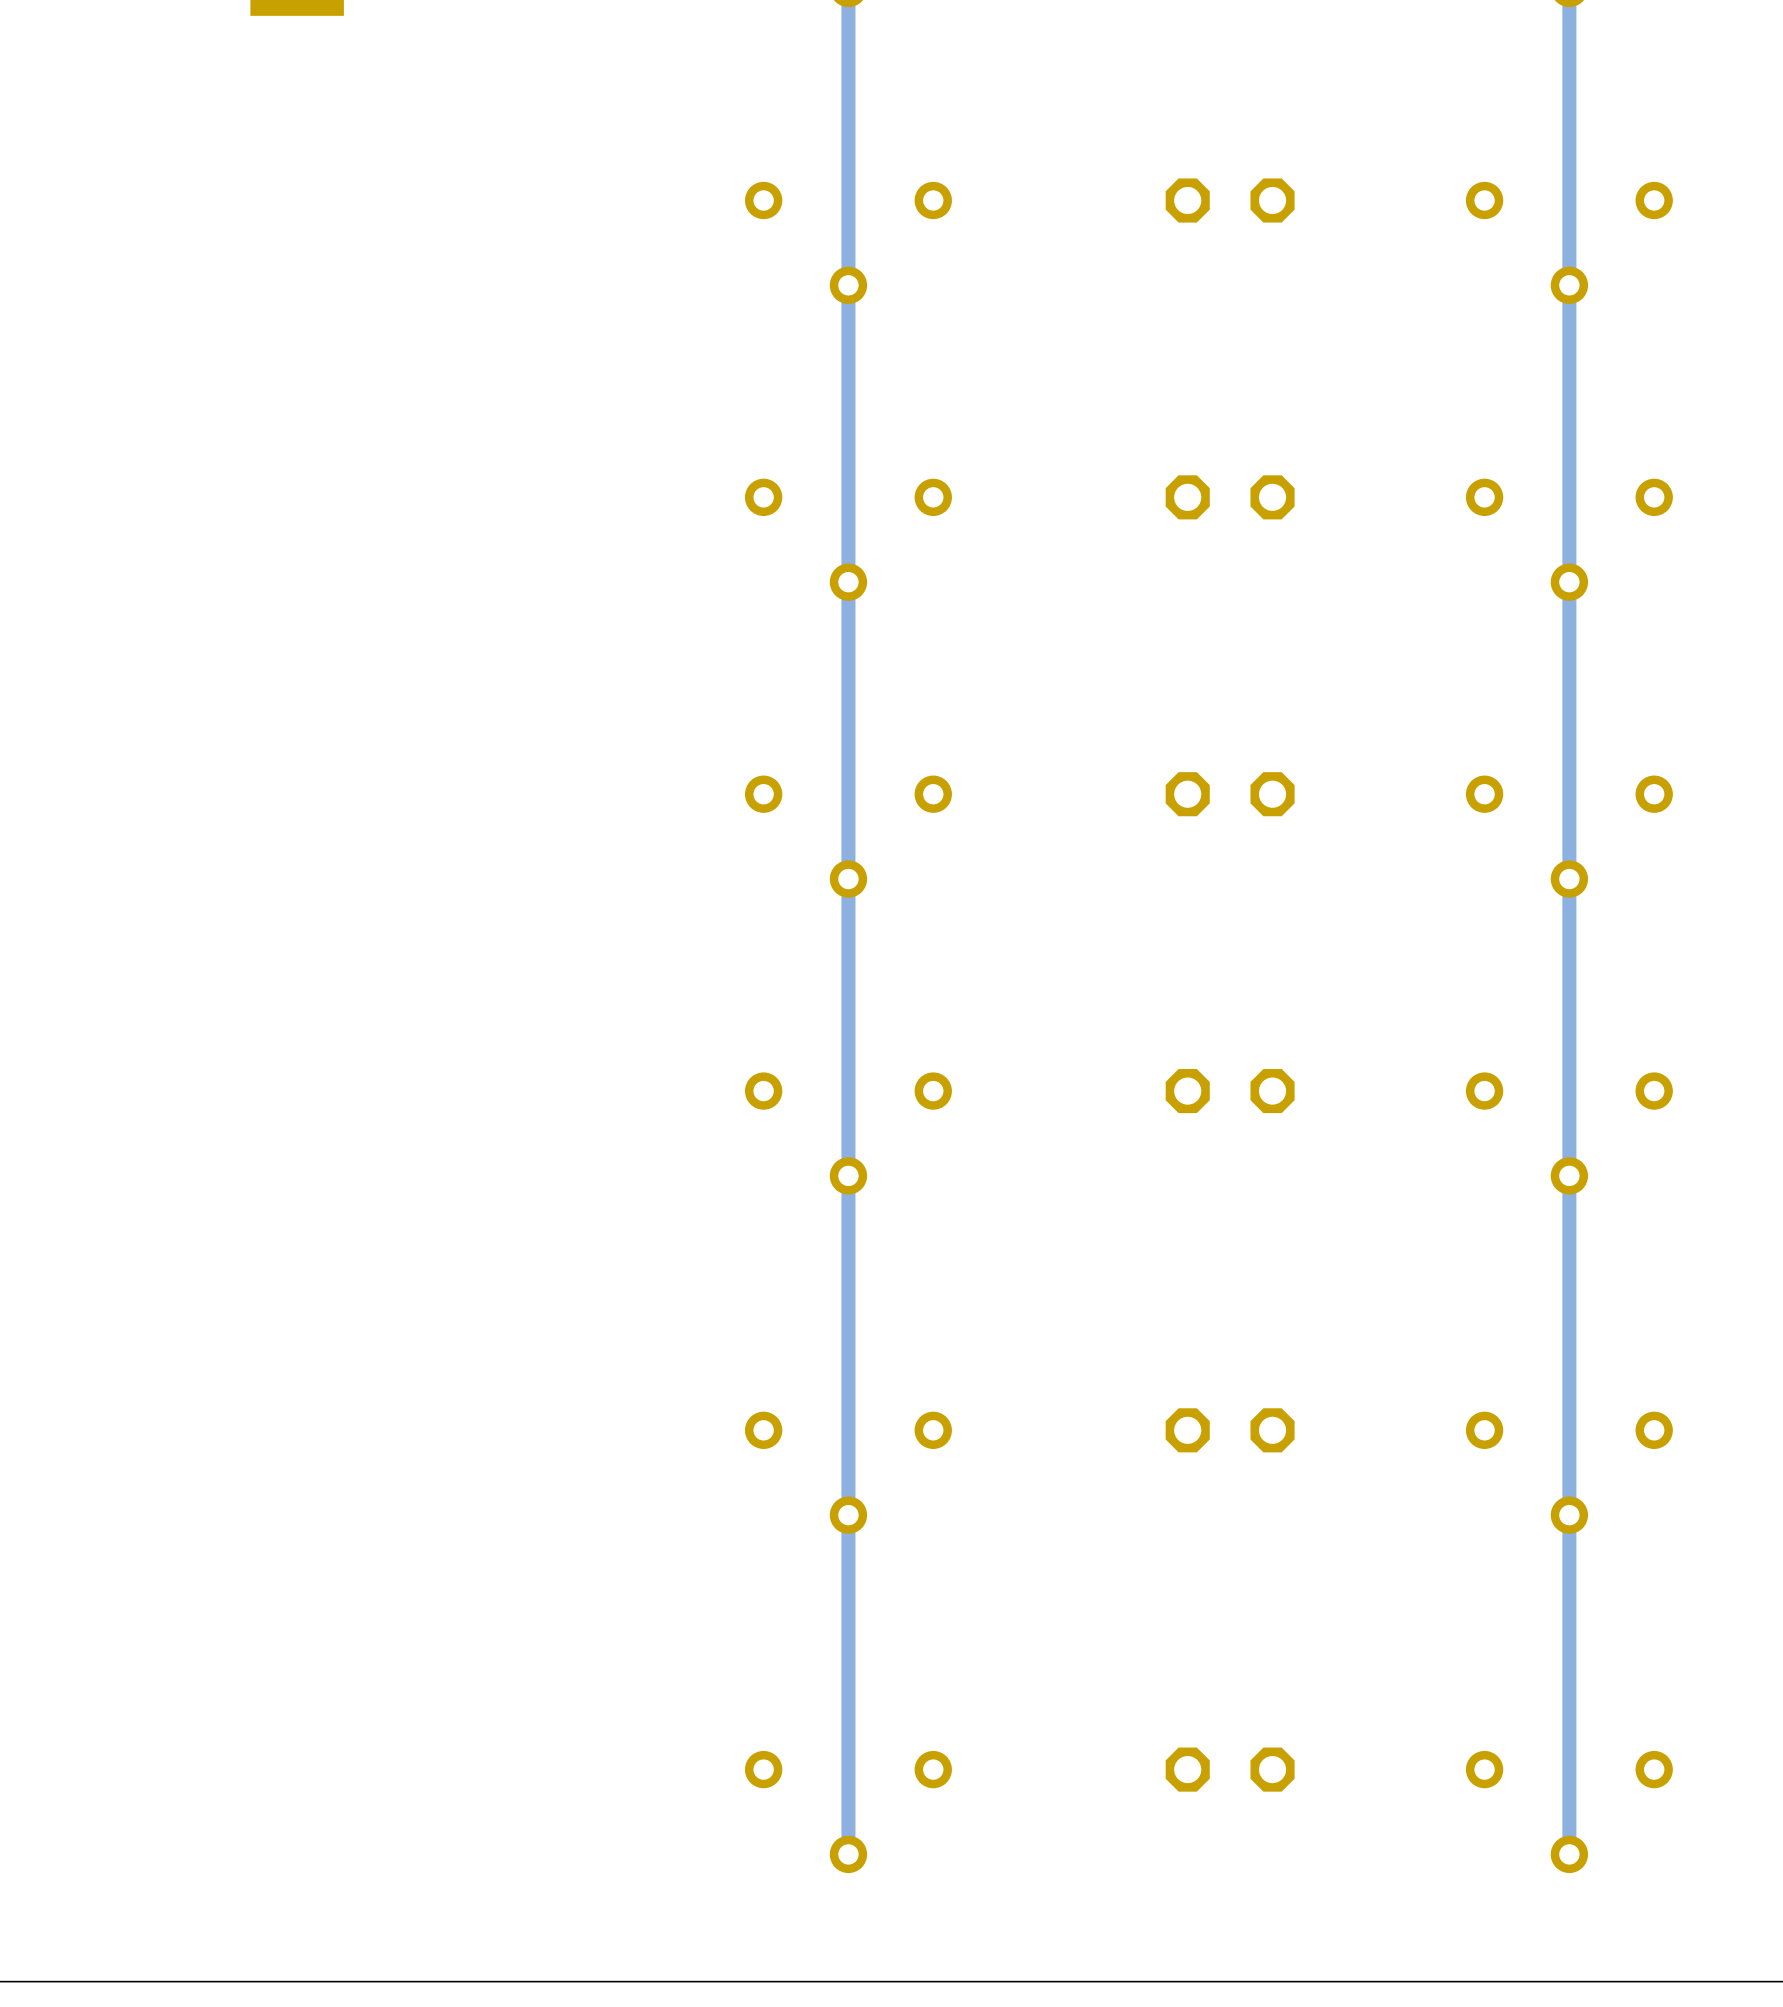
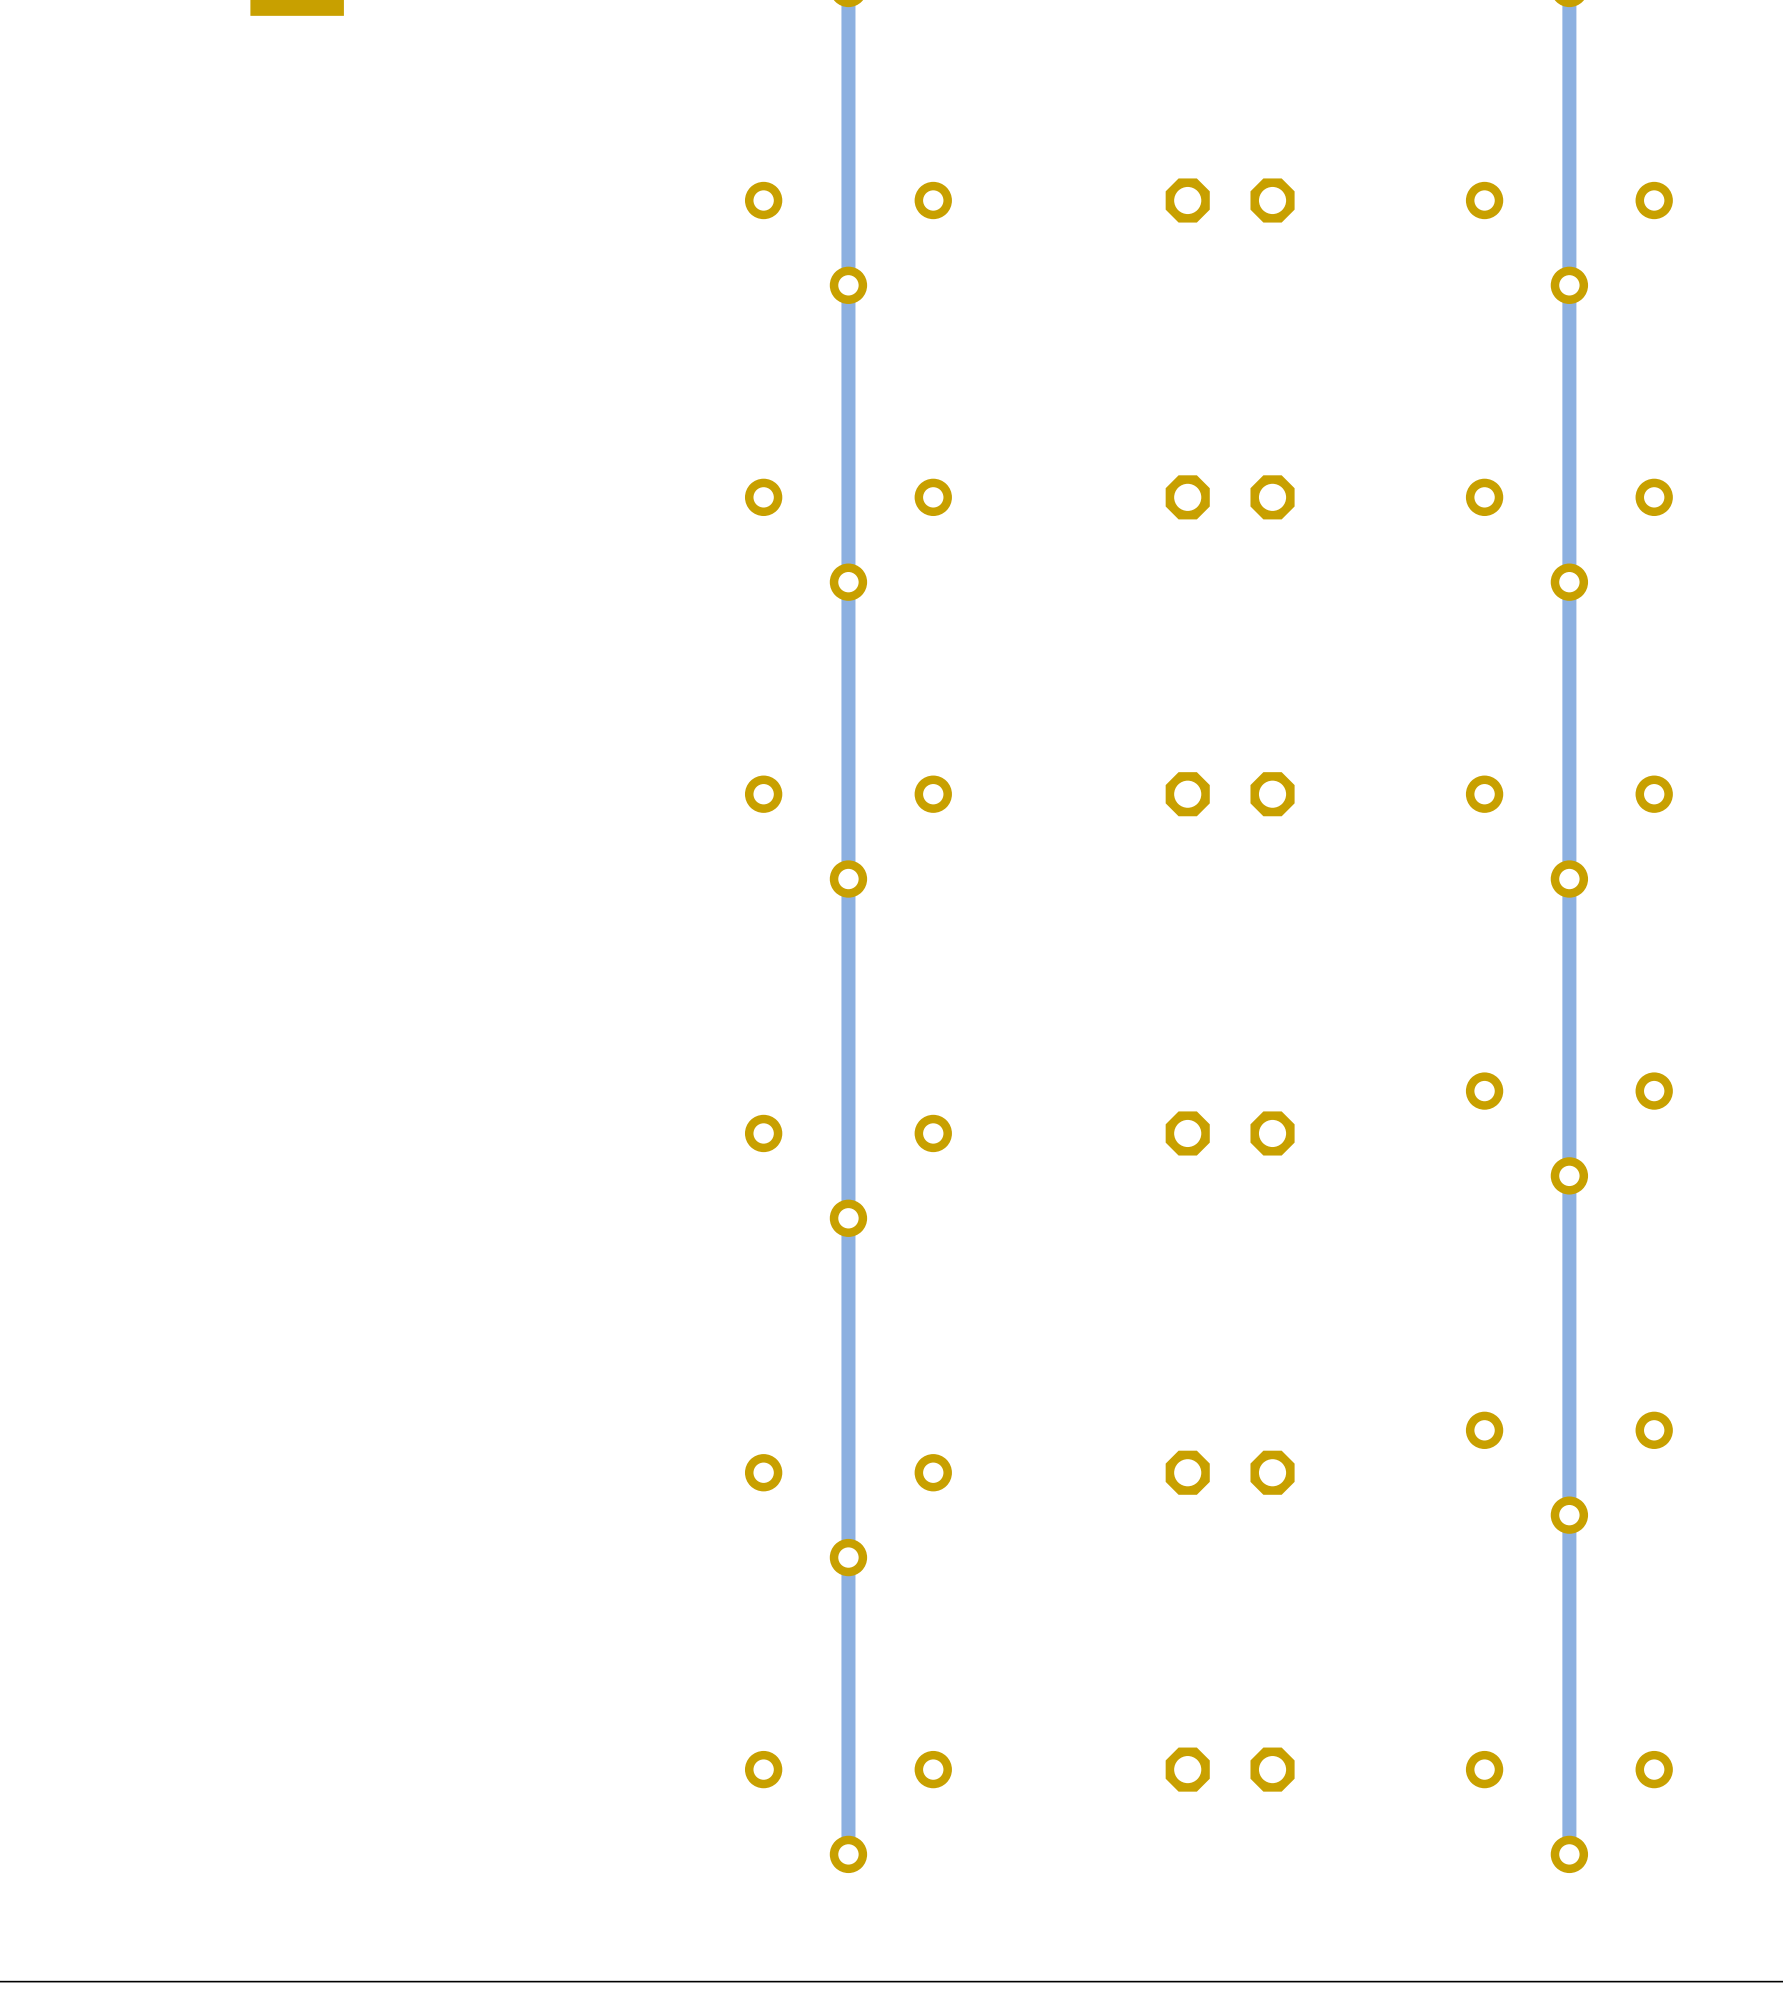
part position: (1230, 1091) -> (1230, 1133)
part position: (848, 1133) -> (848, 1175)
part position: (1230, 1430) -> (1230, 1472)
part position: (848, 1472) -> (848, 1515)

